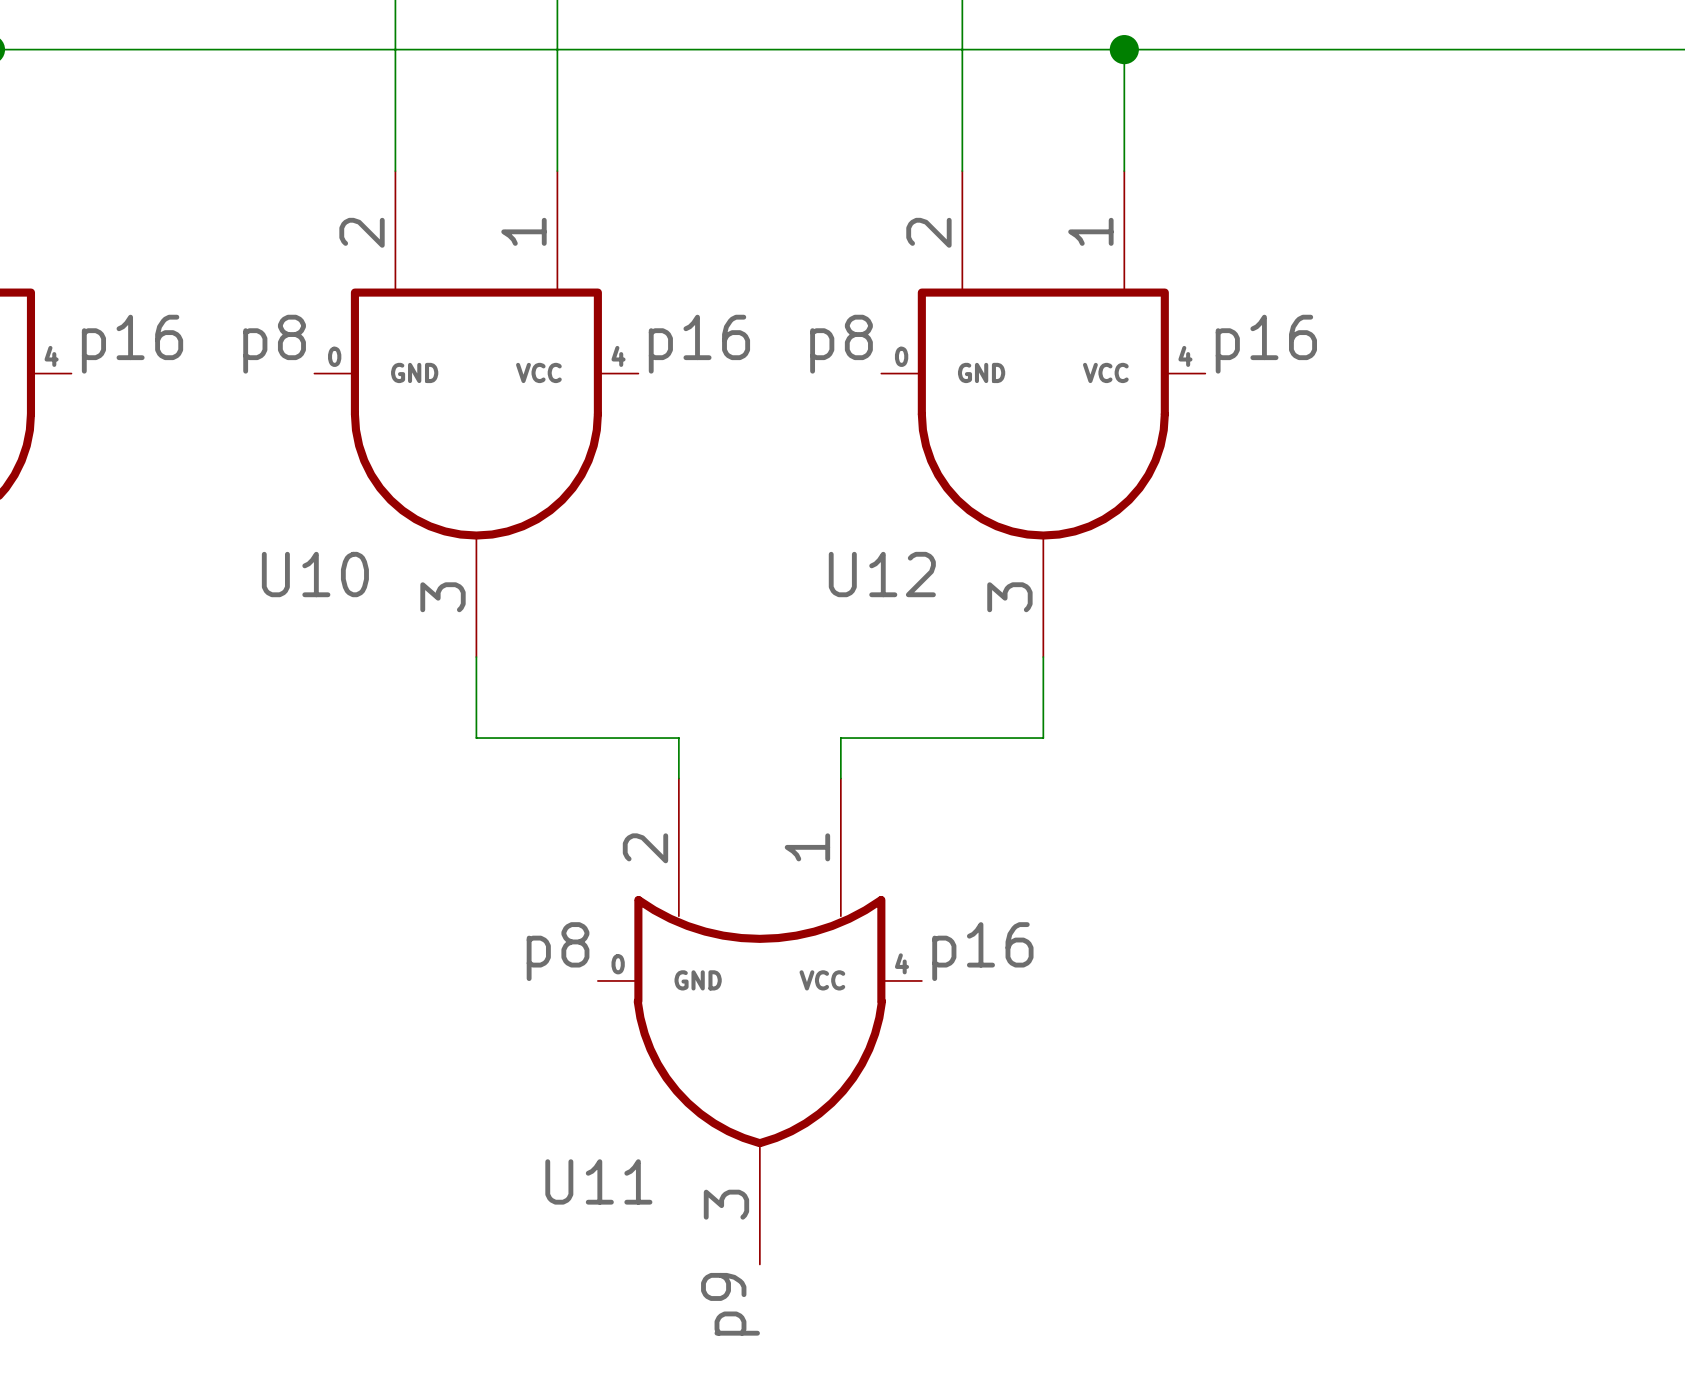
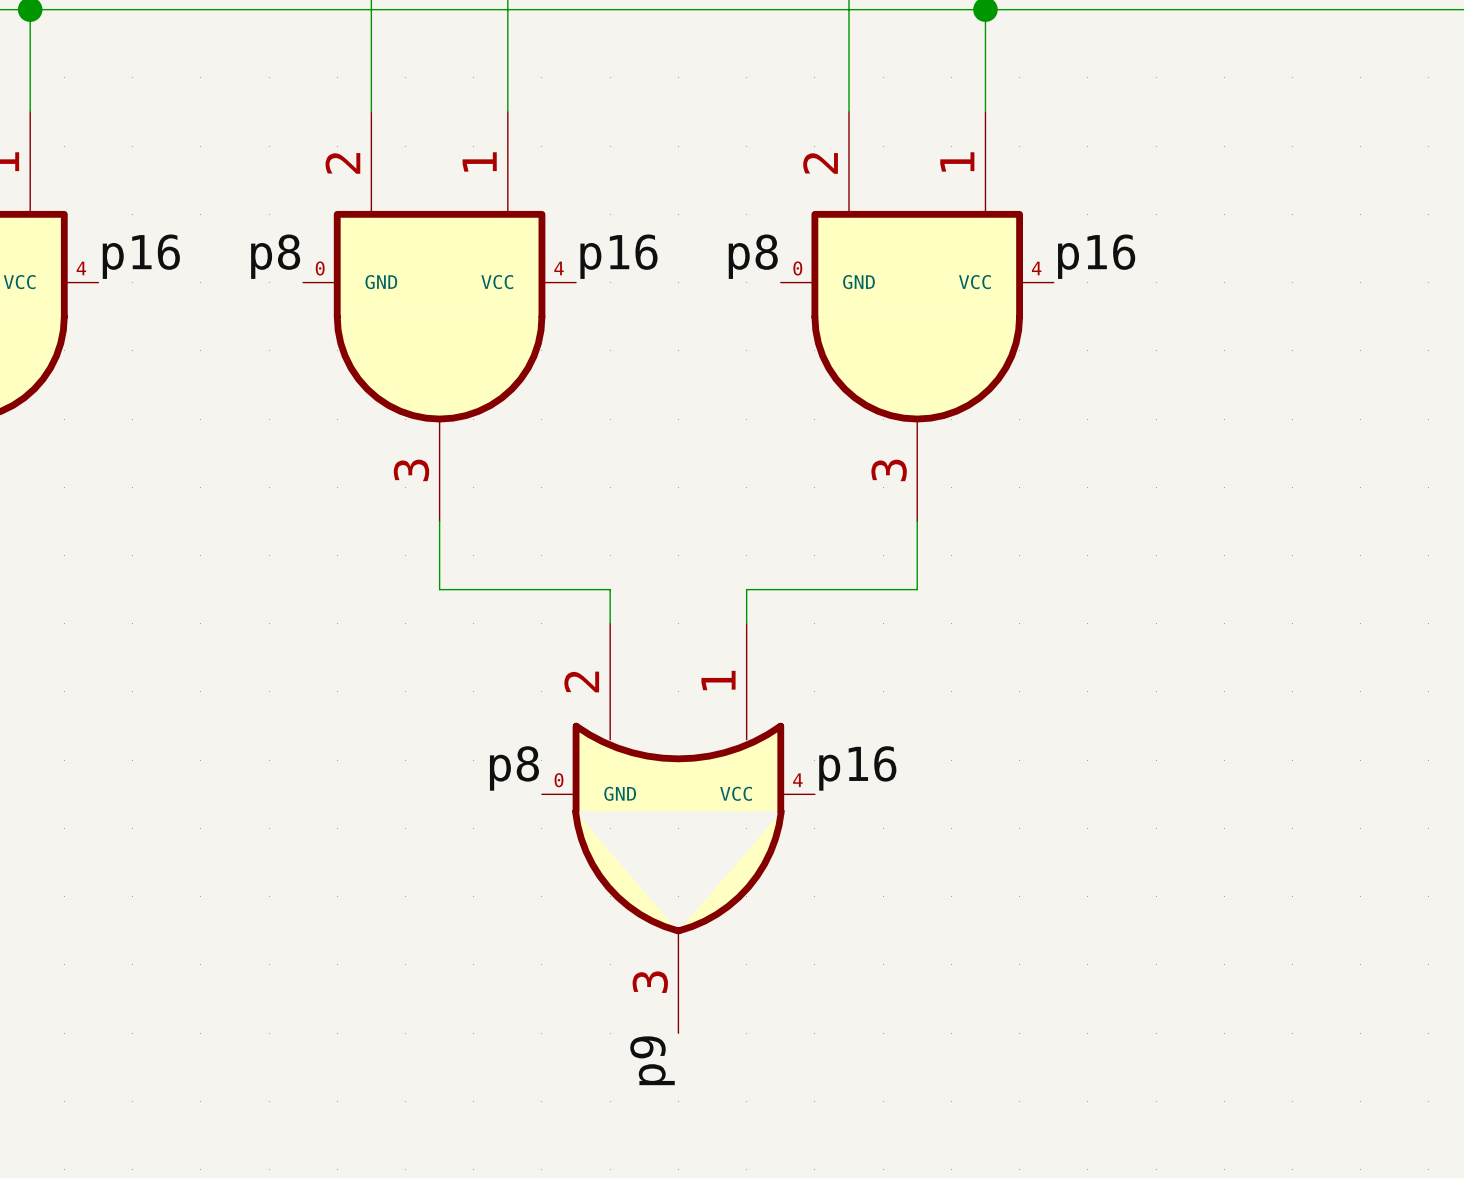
U10 name: U10 (315, 574) -> none
U12 name: U12 (882, 574) -> none
U11 name: U11 (598, 1181) -> none

